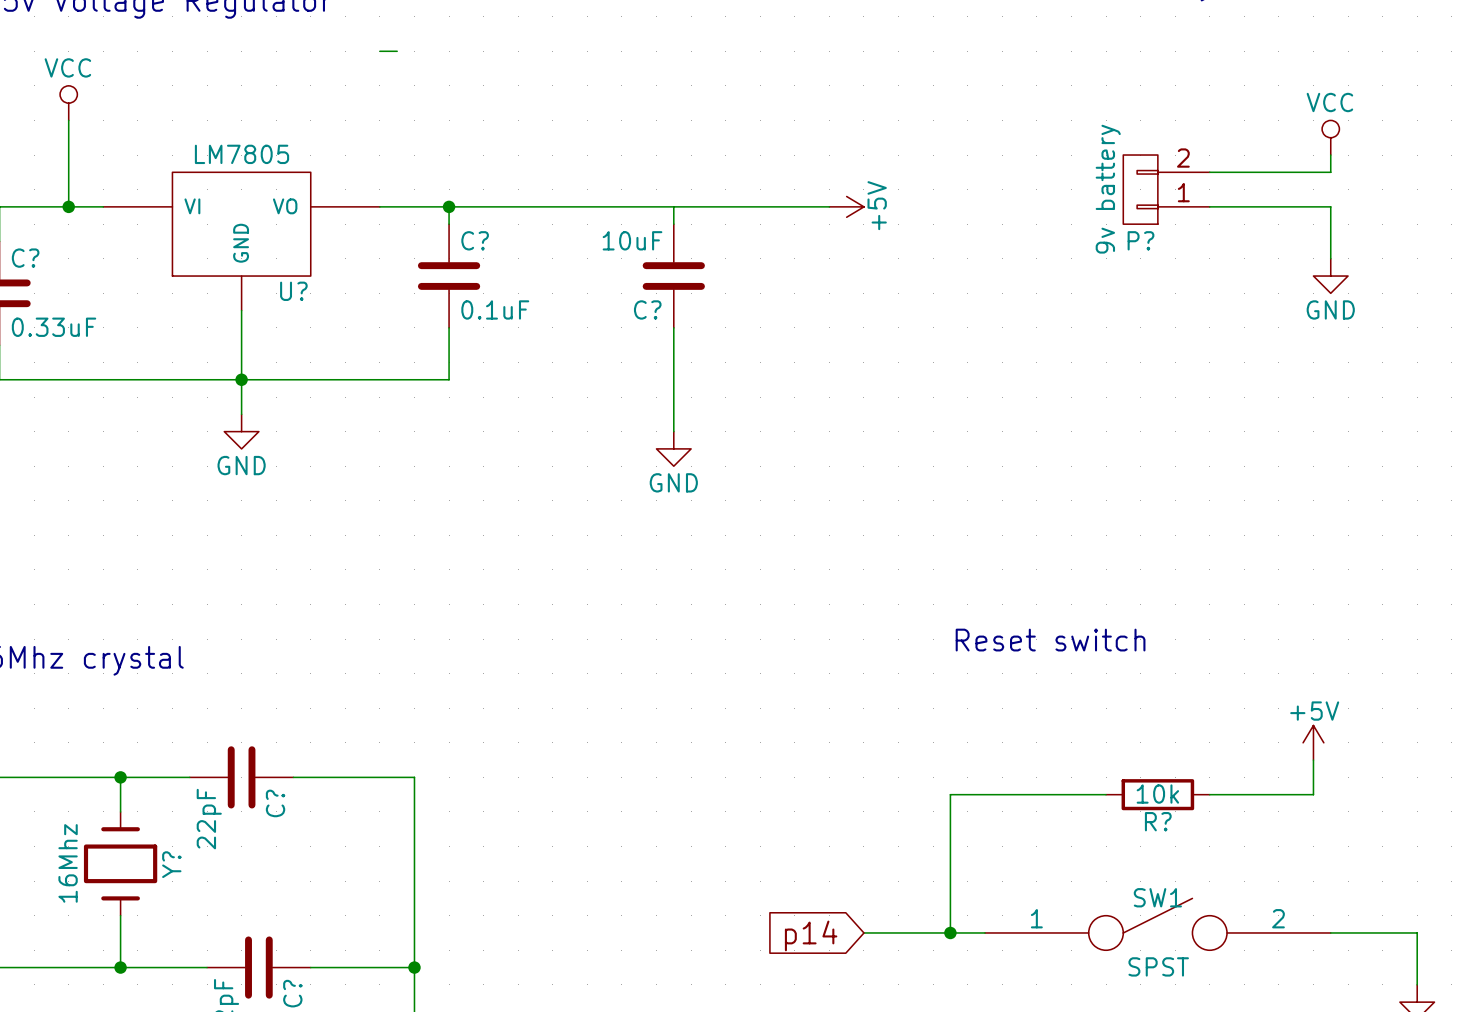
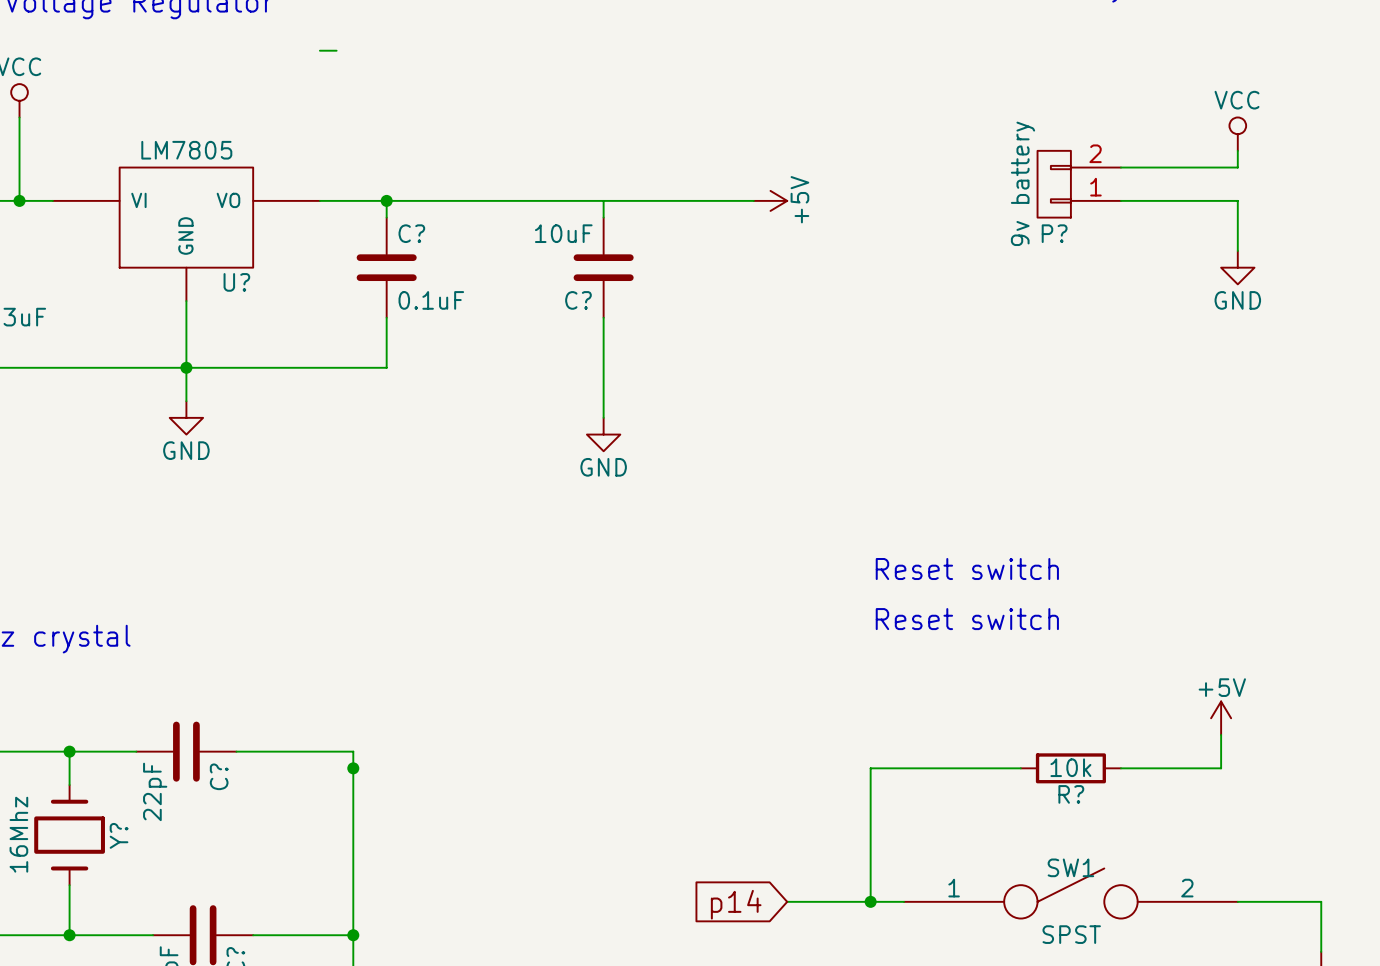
text: none -> Reset switch (967, 569)
junction: none -> (353, 768)

